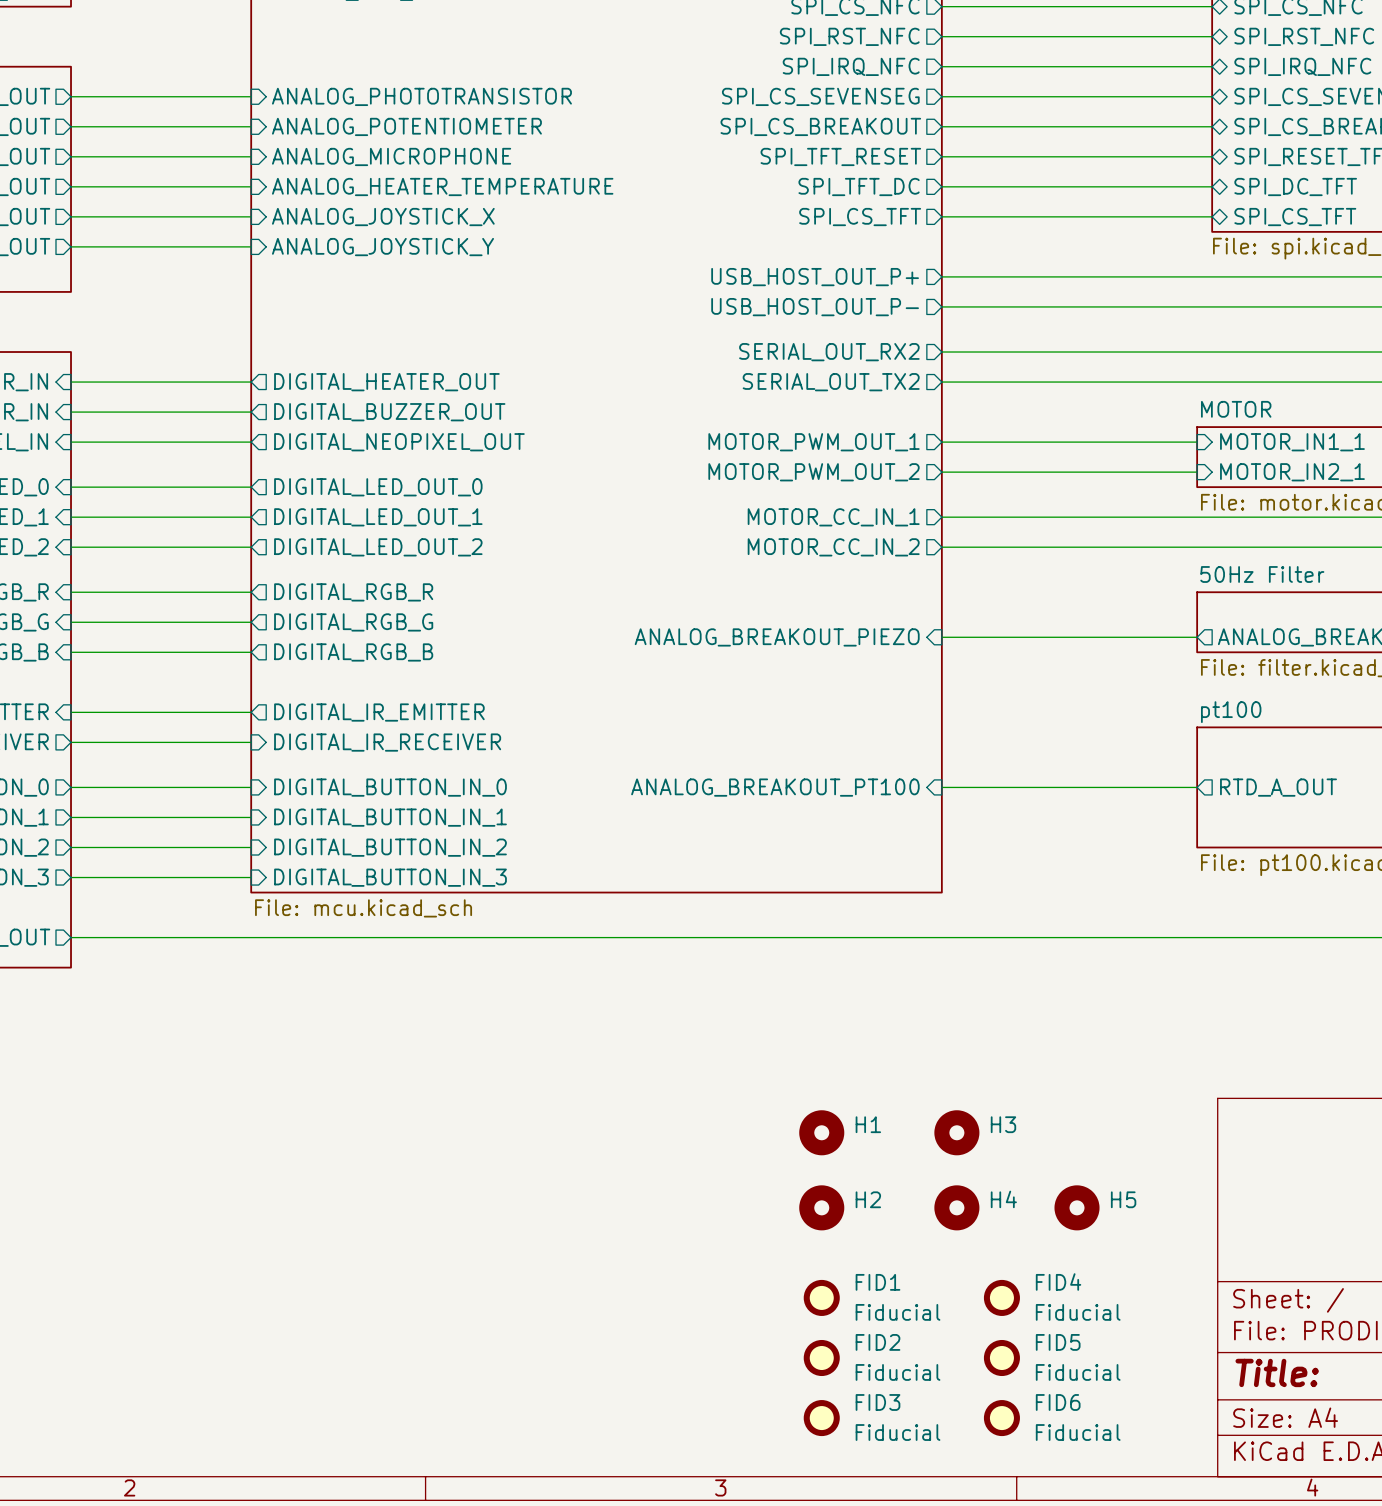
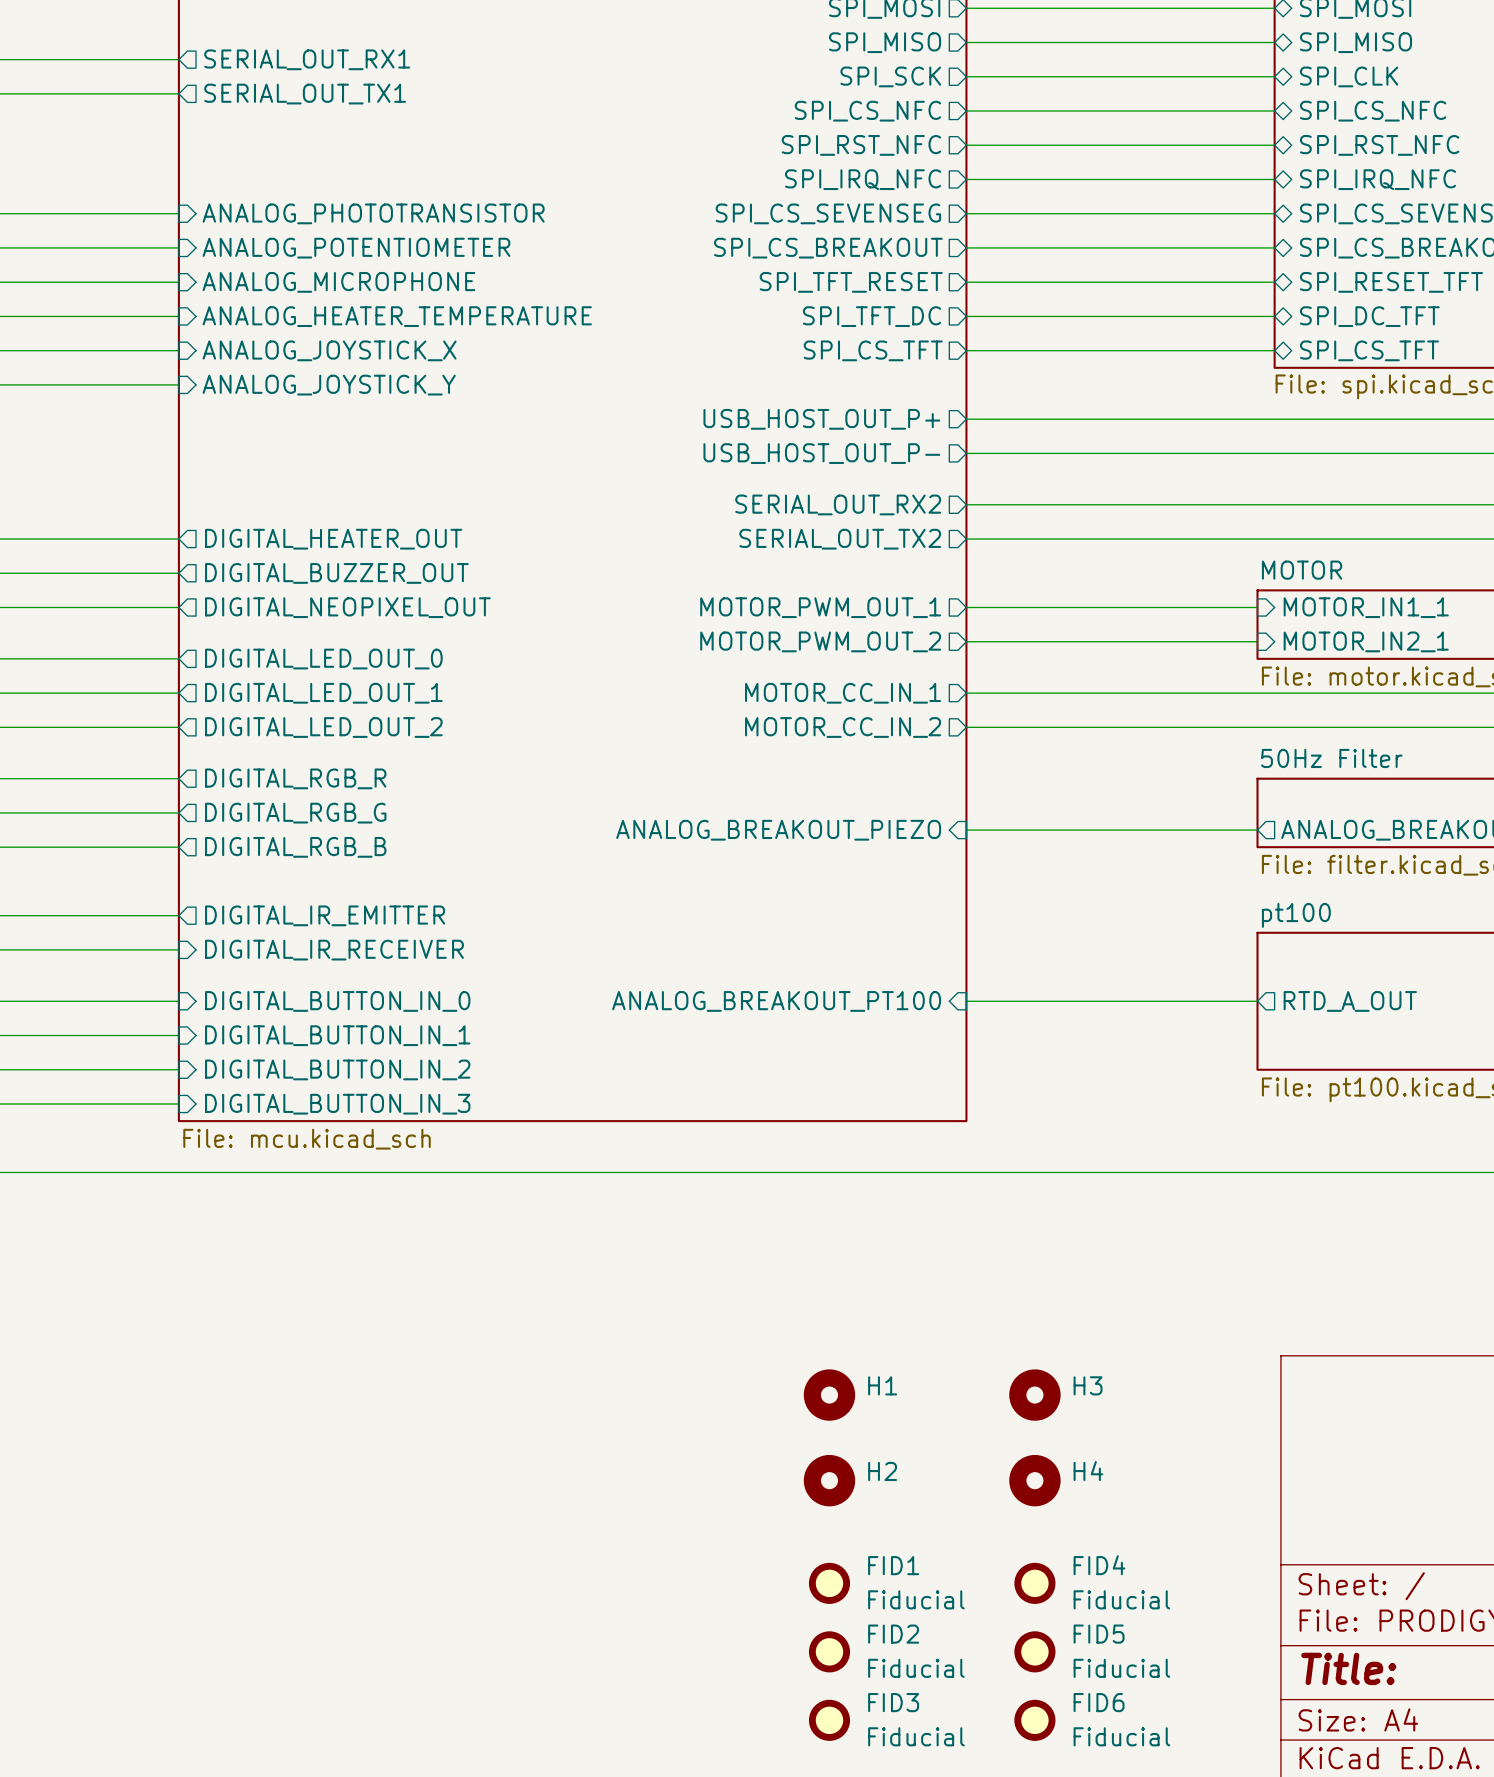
H3 position: (956, 1132) -> (1034, 1395)
H4 position: (956, 1207) -> (1034, 1480)
H5: (1077, 1207) -> none

